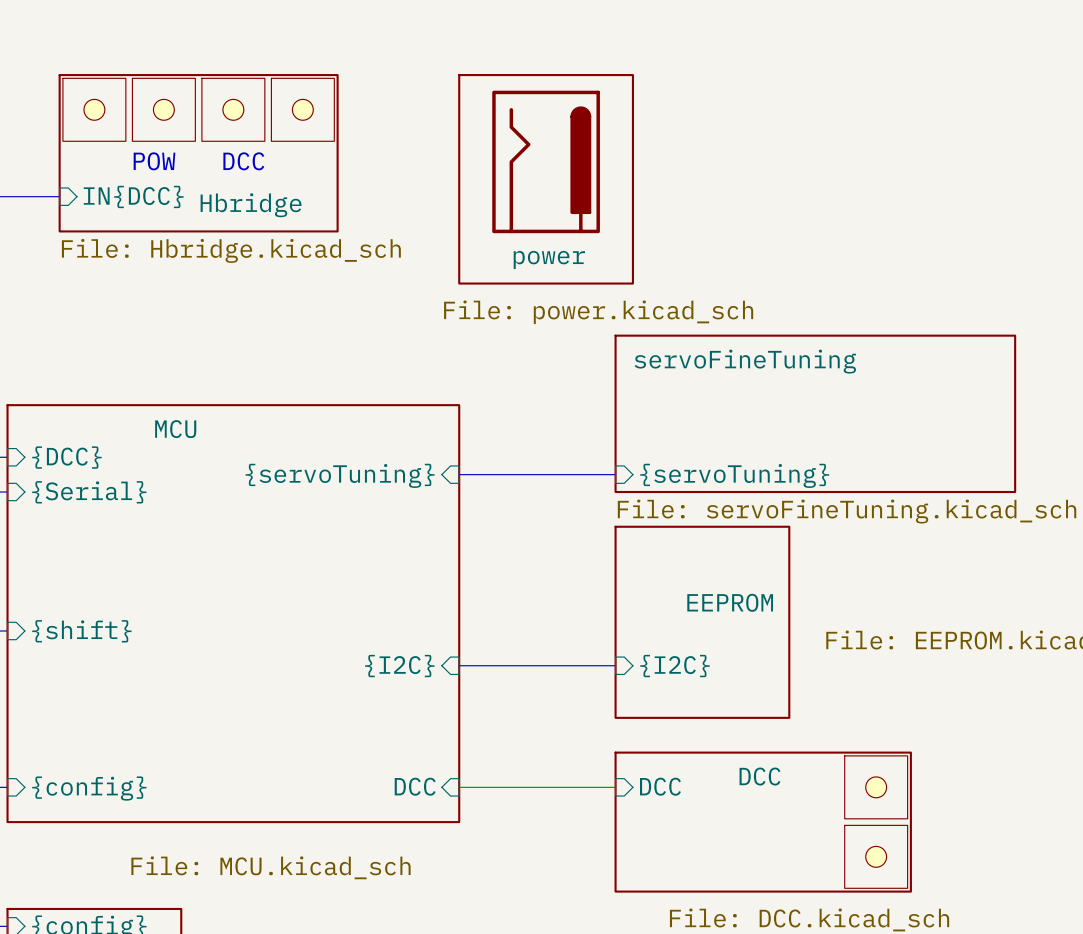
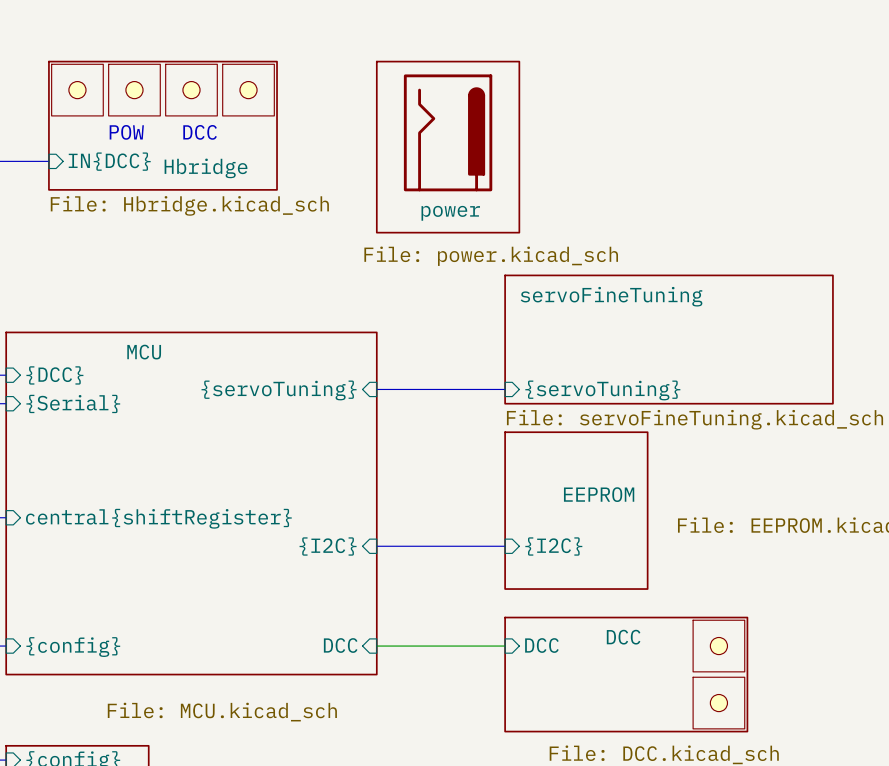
sheet pin: {shift} (81, 631) -> central{shiftRegister} (158, 518)

